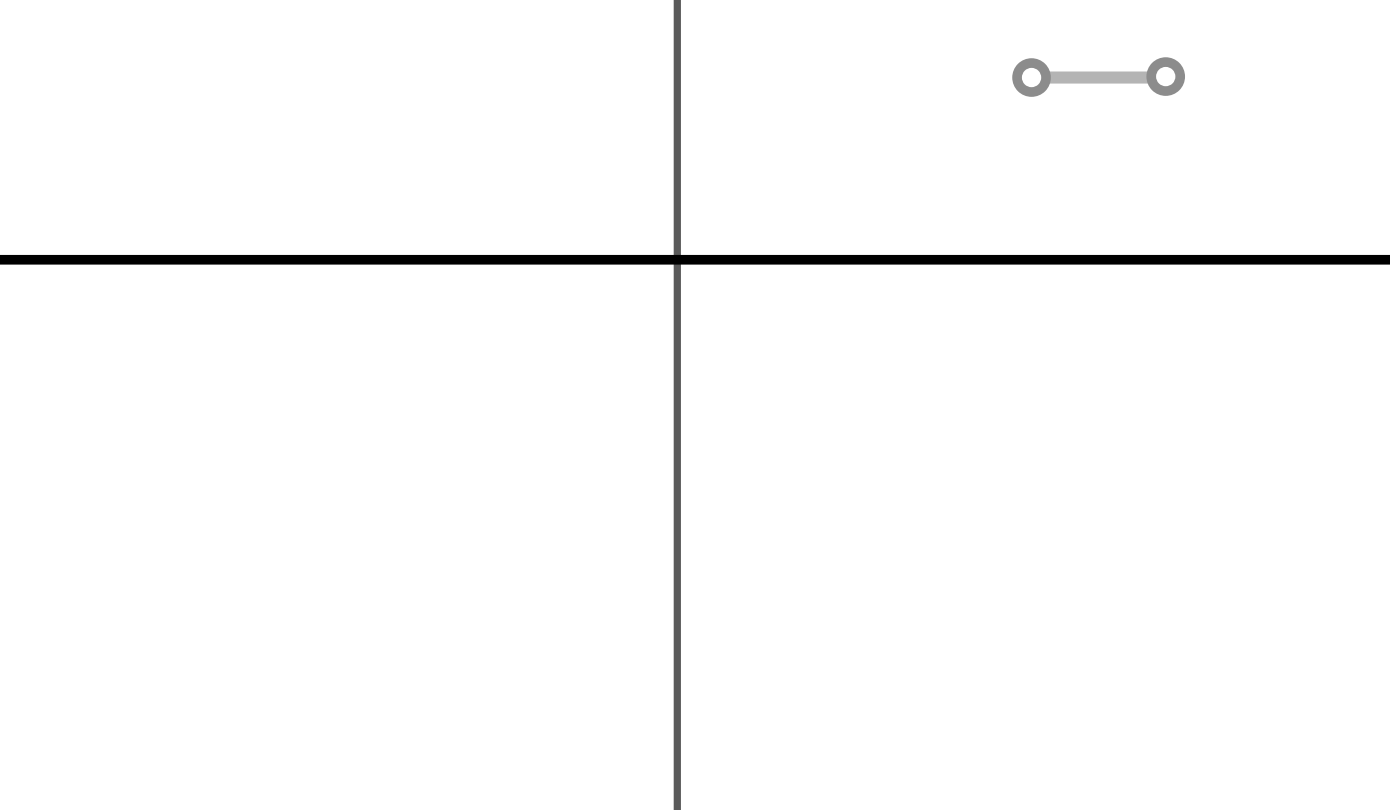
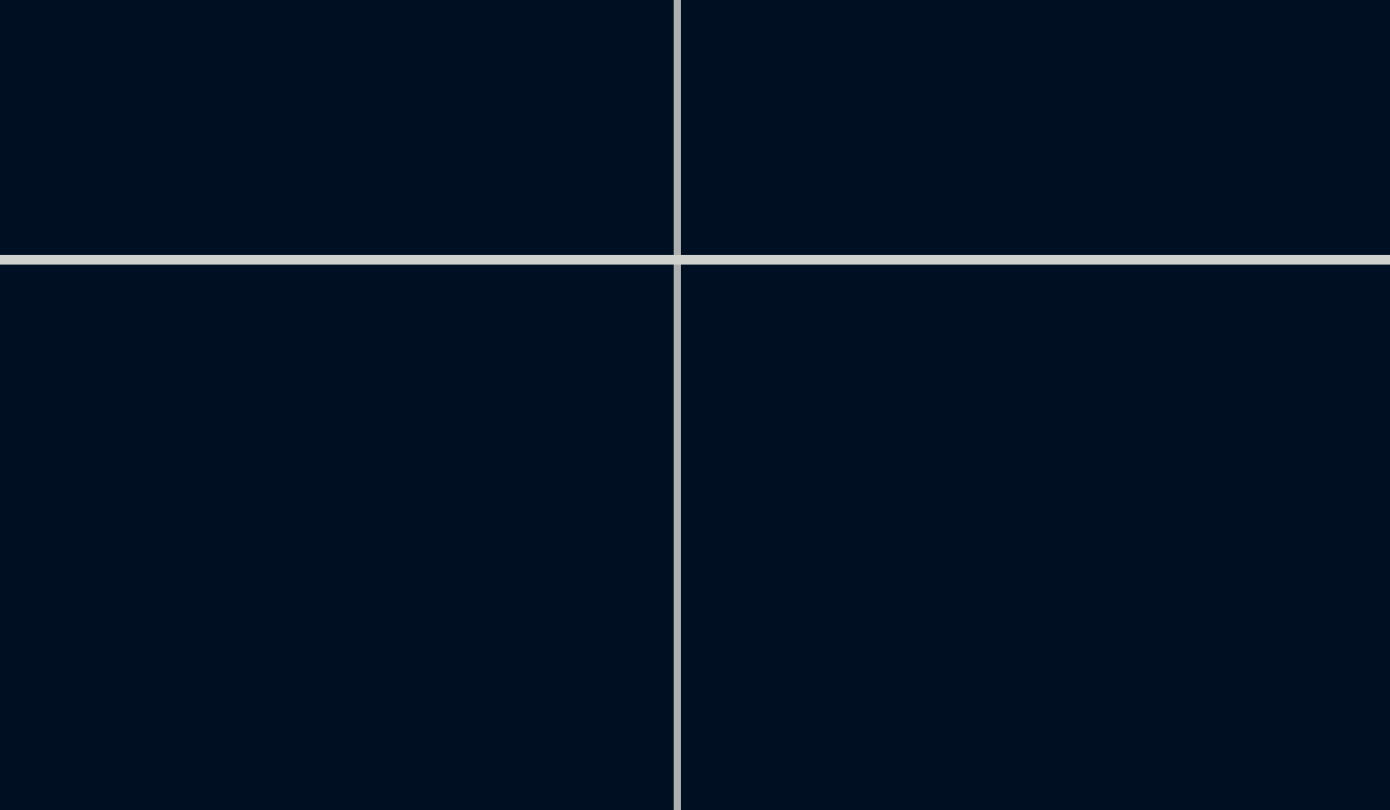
track: (1165, 76) (1031, 77) -> none
via: (1165, 76) -> none
via: (1031, 77) -> none

